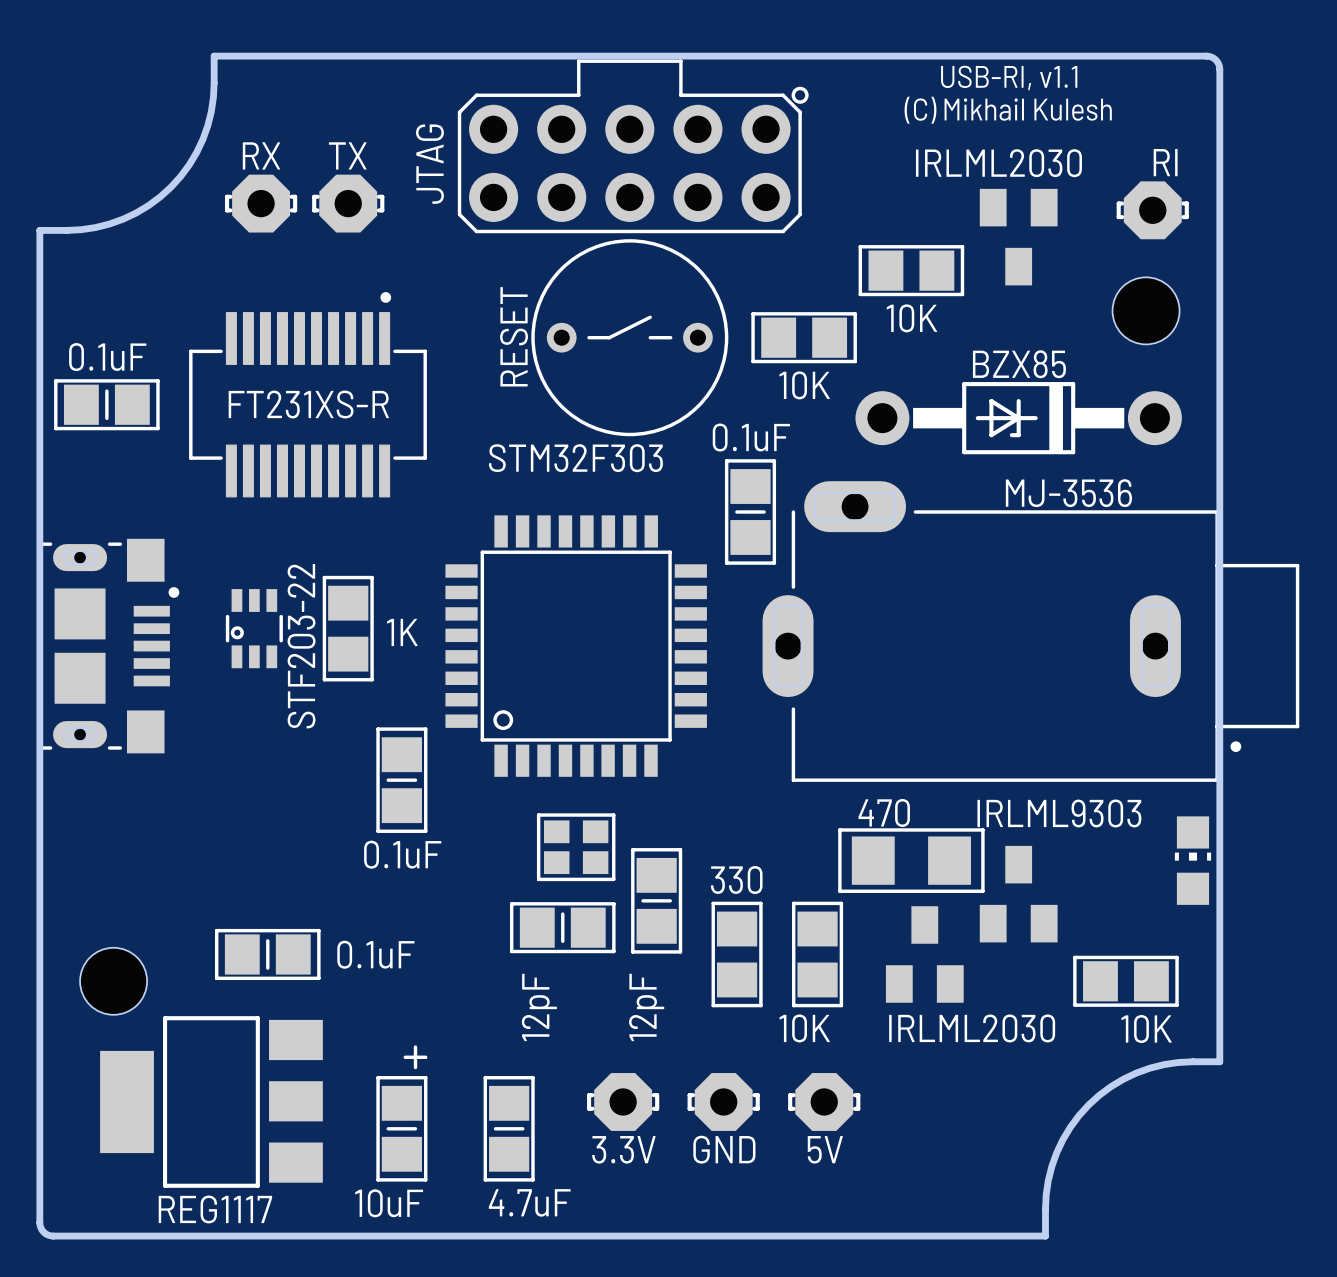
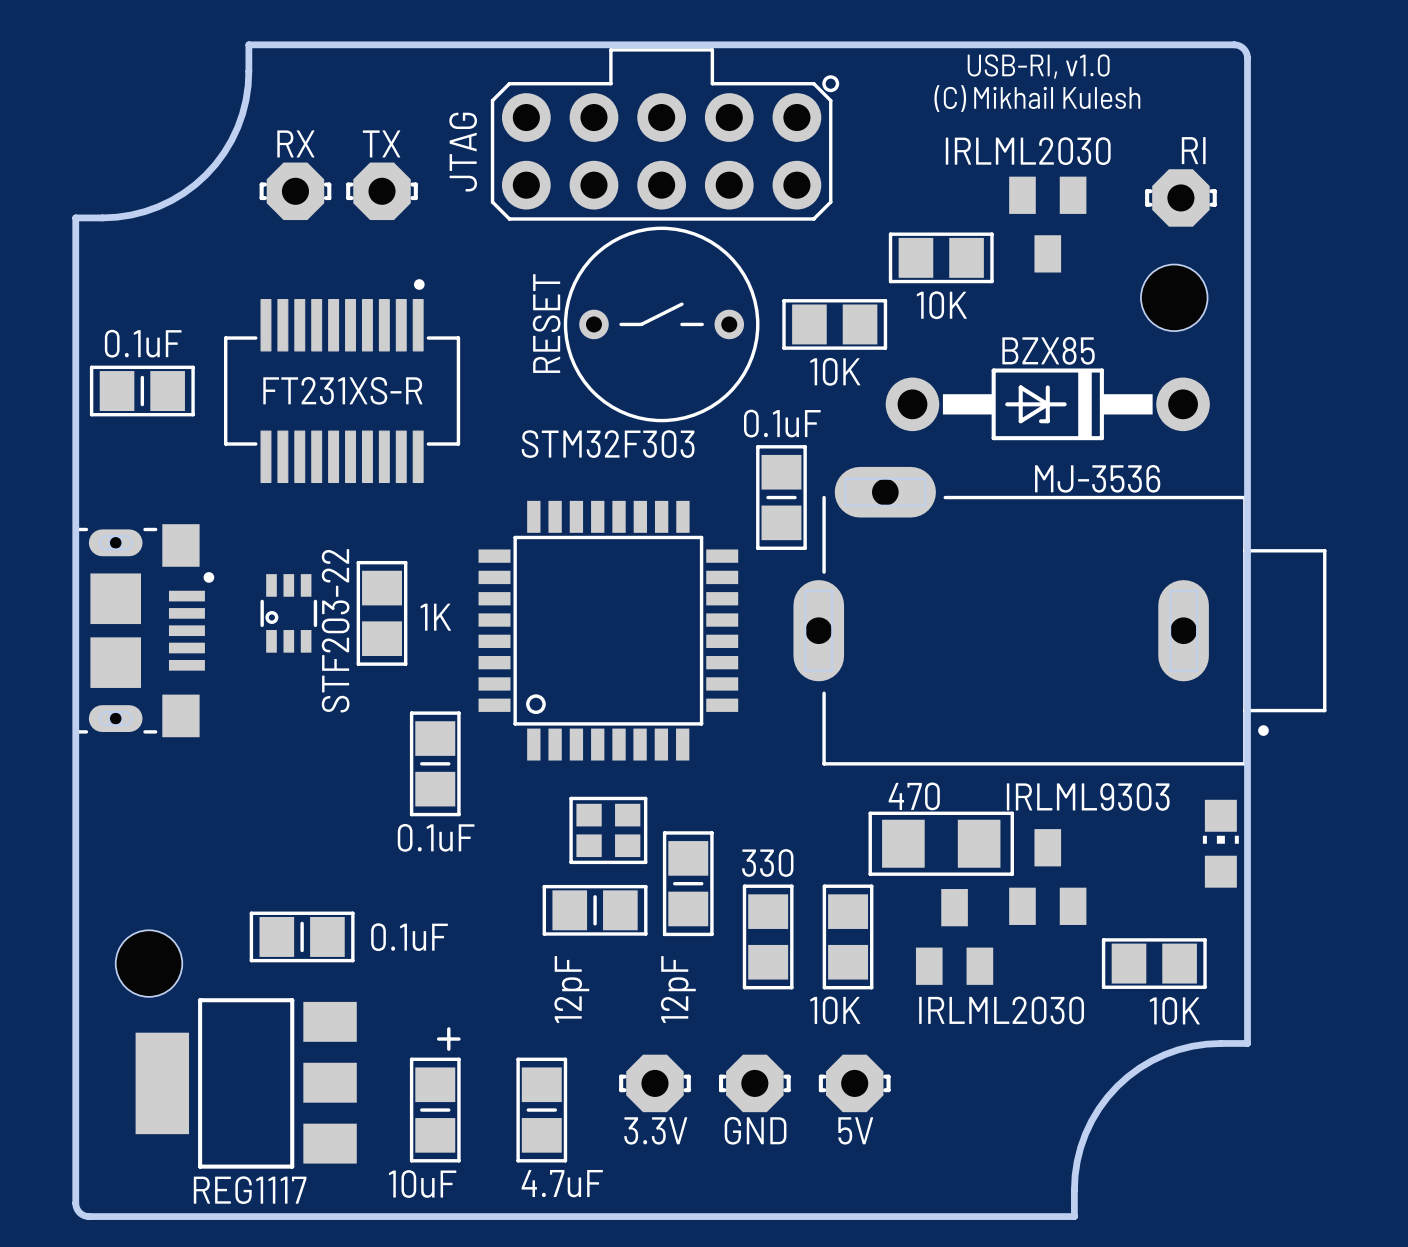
text: USB-RI, v1.1 (1009, 77) -> USB-RI, v1.0 (1038, 66)

